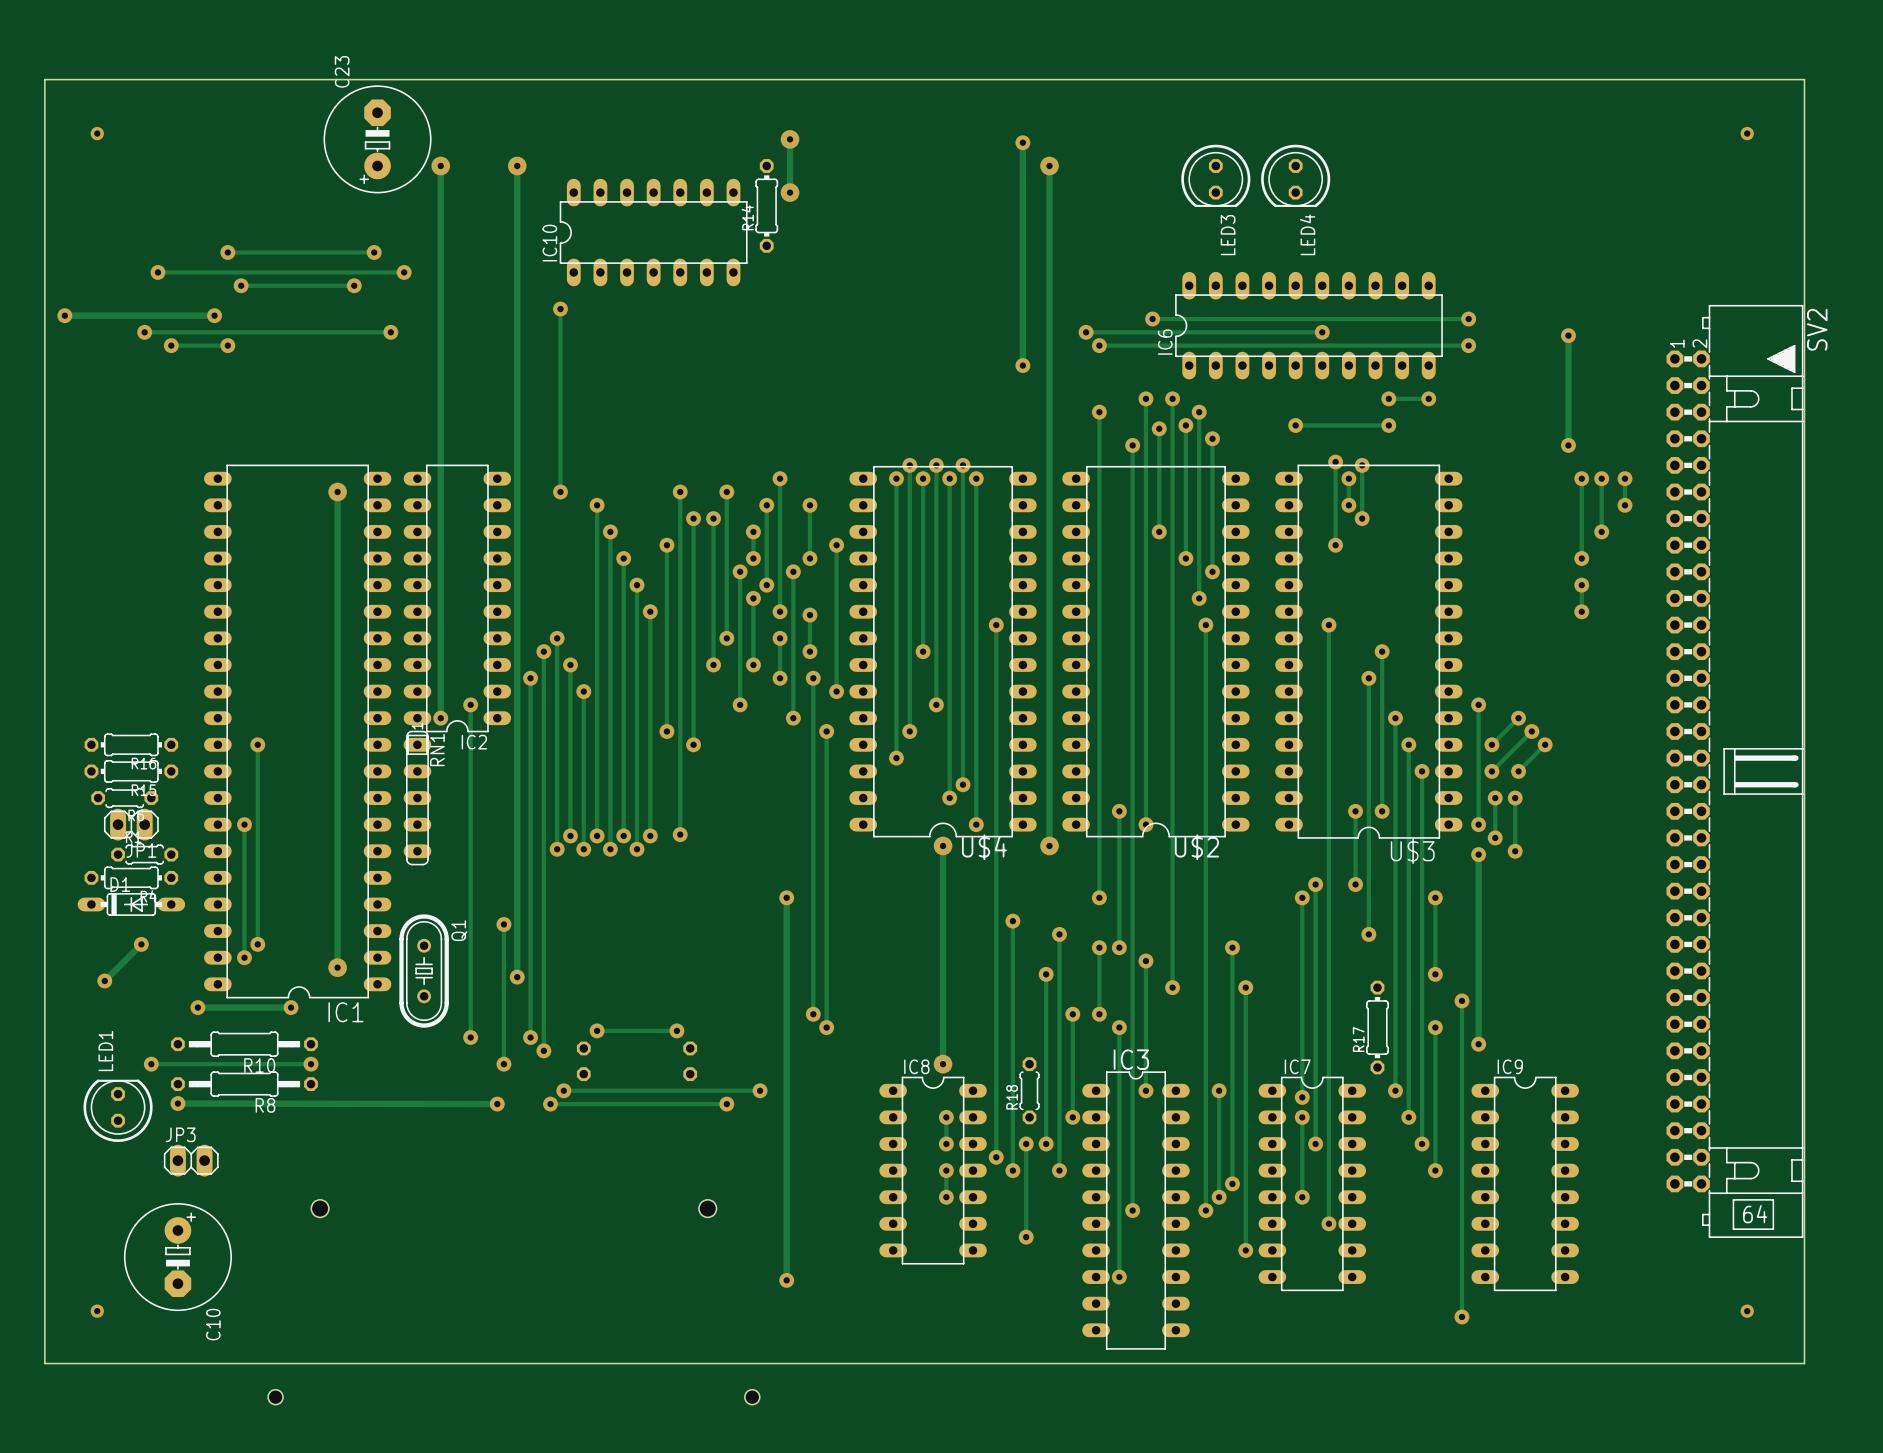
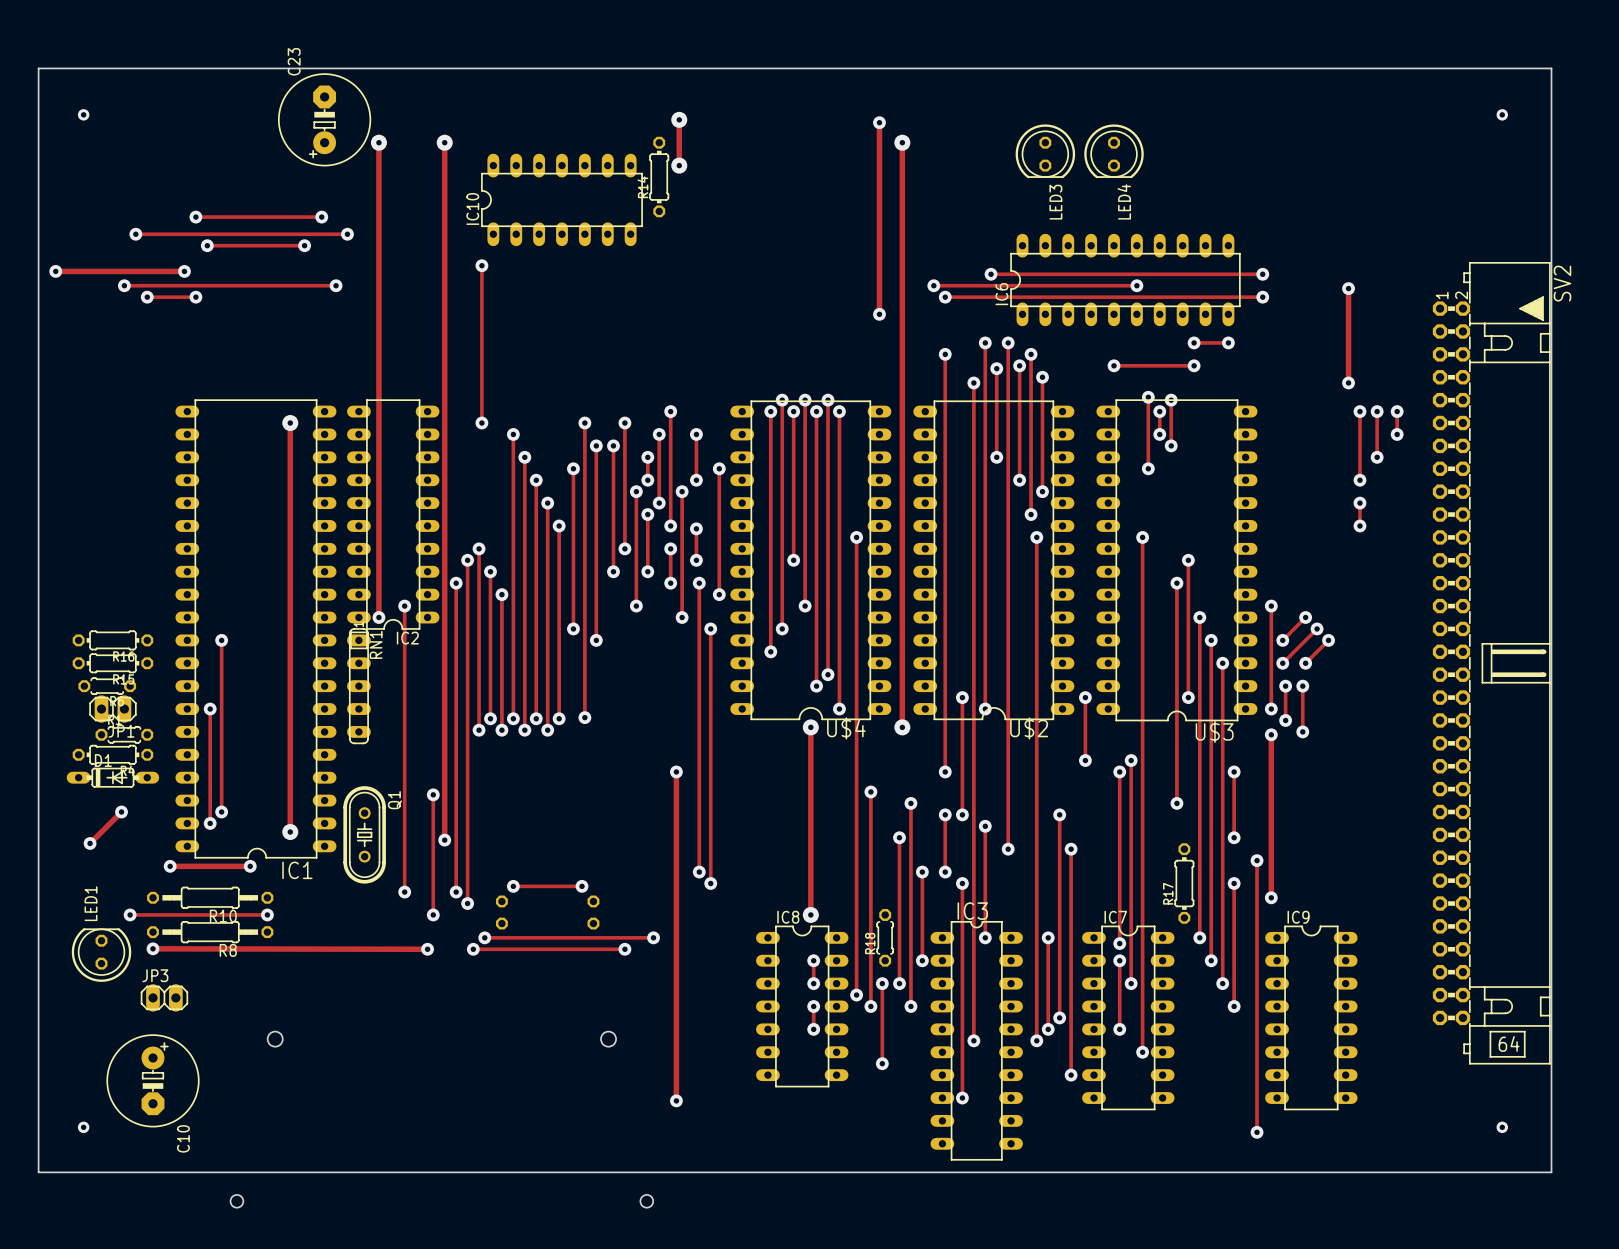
via: none -> (1085, 697)
track: (1355, 811) (1355, 884) -> (1085, 697) (1085, 760)
via: (1355, 811) -> none
via: none -> (1085, 760)
via: (1355, 884) -> none

